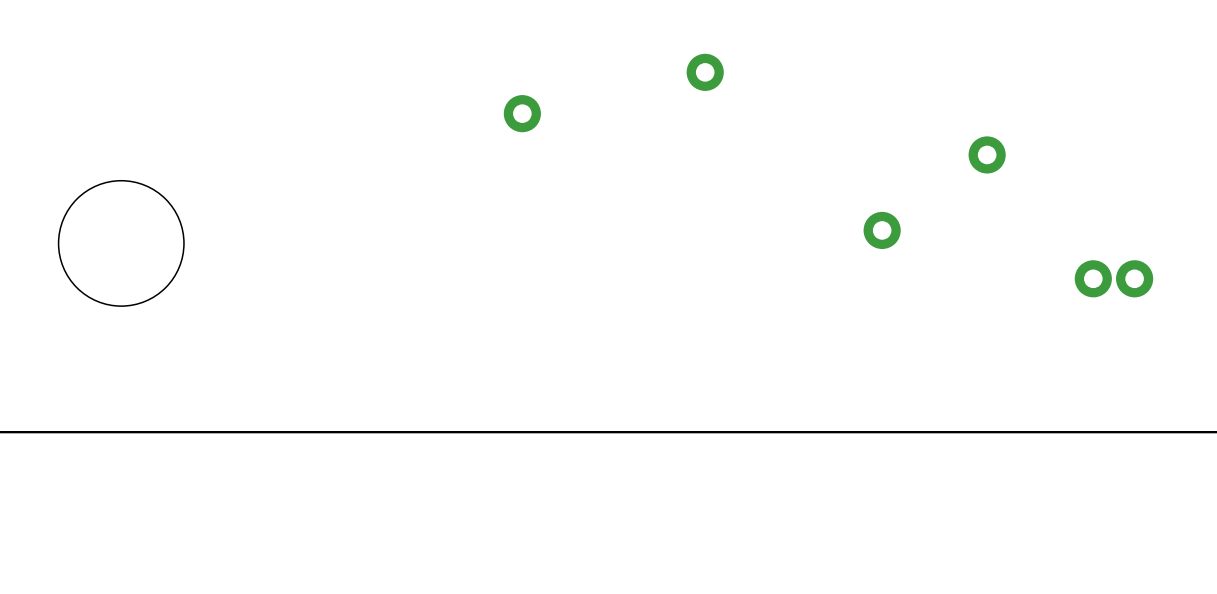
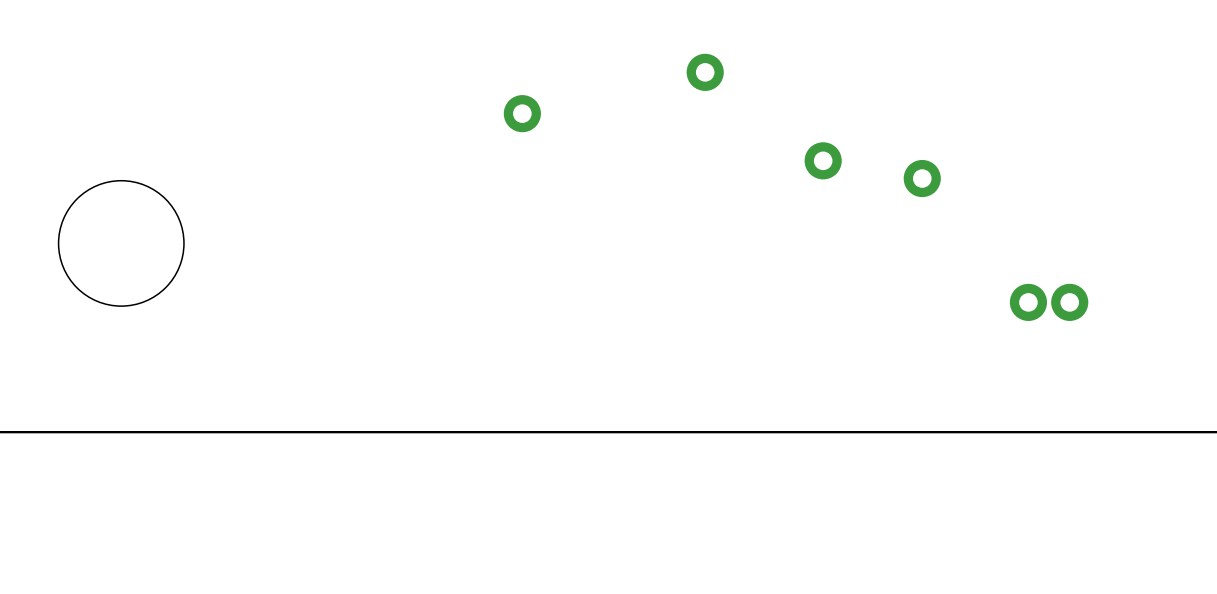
via: (987, 154) -> none
via: none -> (823, 160)
via: none -> (922, 178)
via: (882, 230) -> none
via position: (1093, 278) -> (1069, 302)
via: (1134, 278) -> none
via: none -> (1028, 302)

